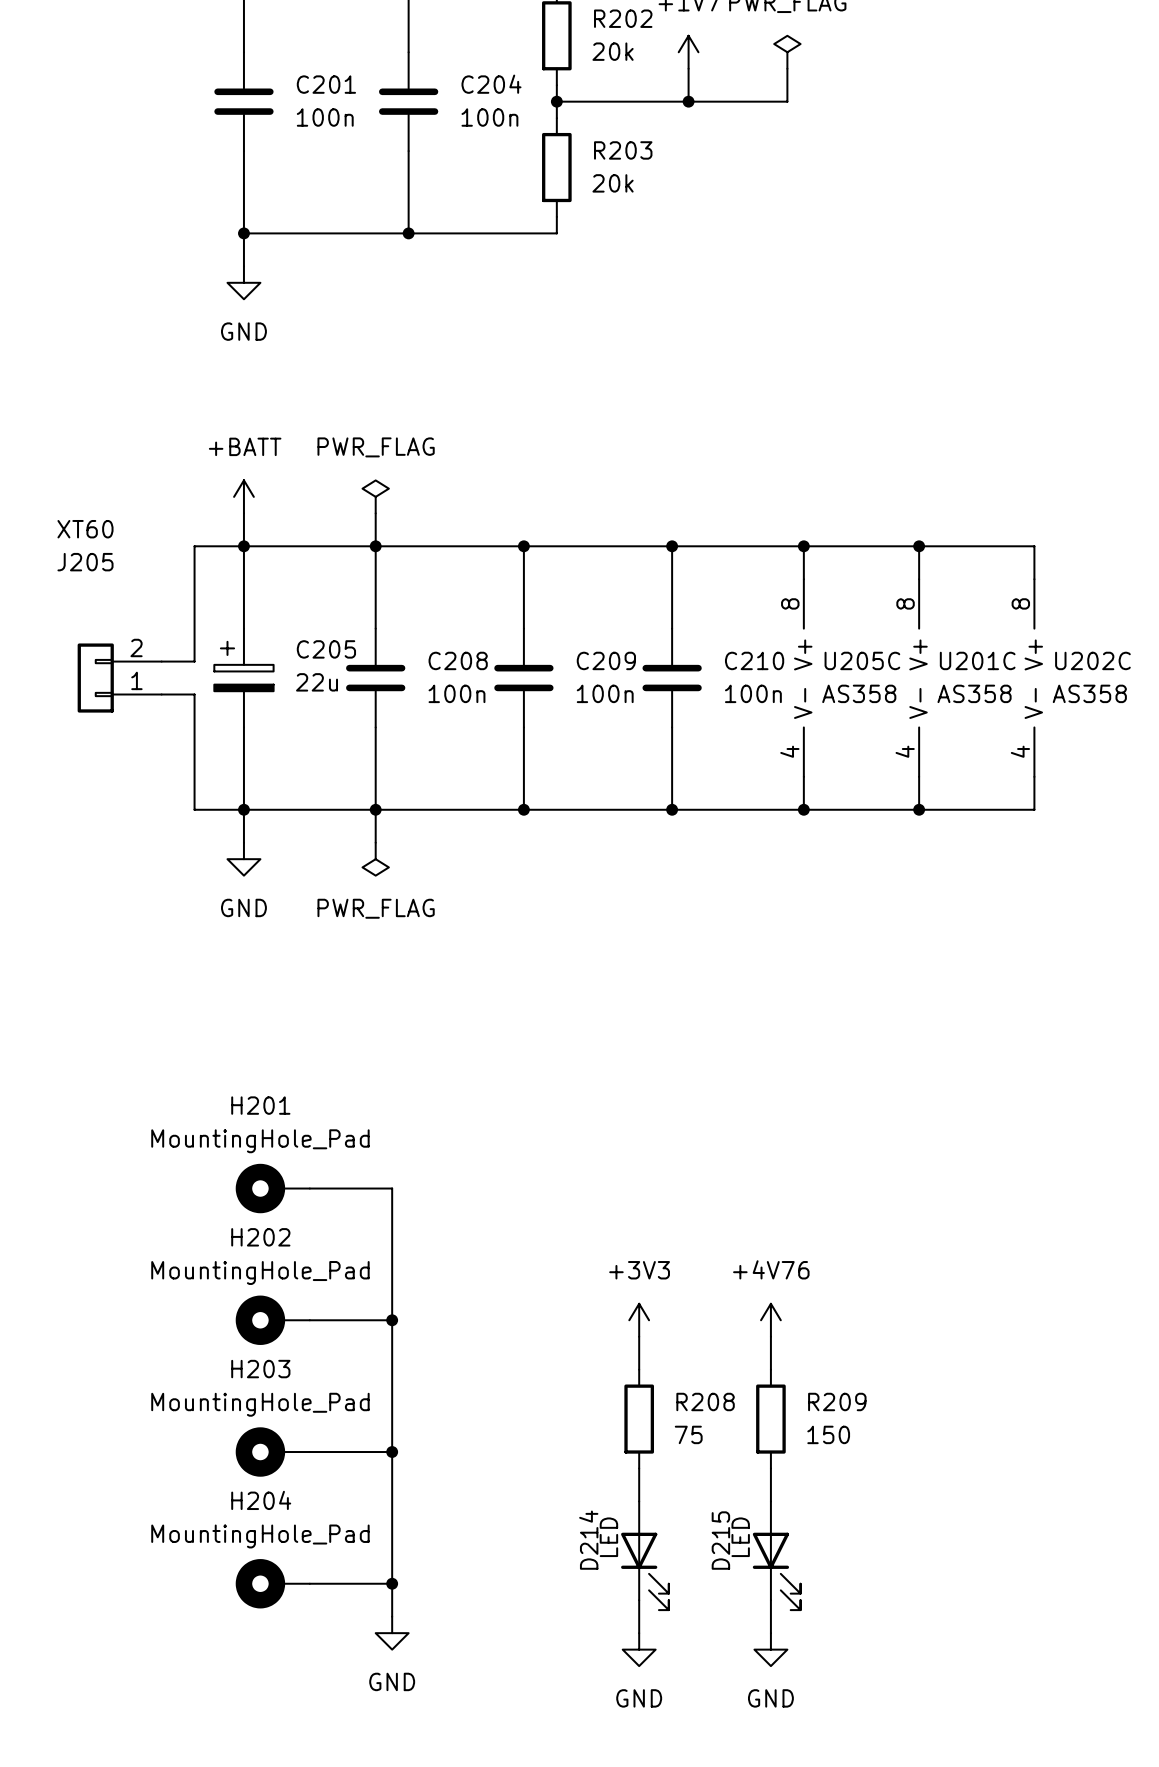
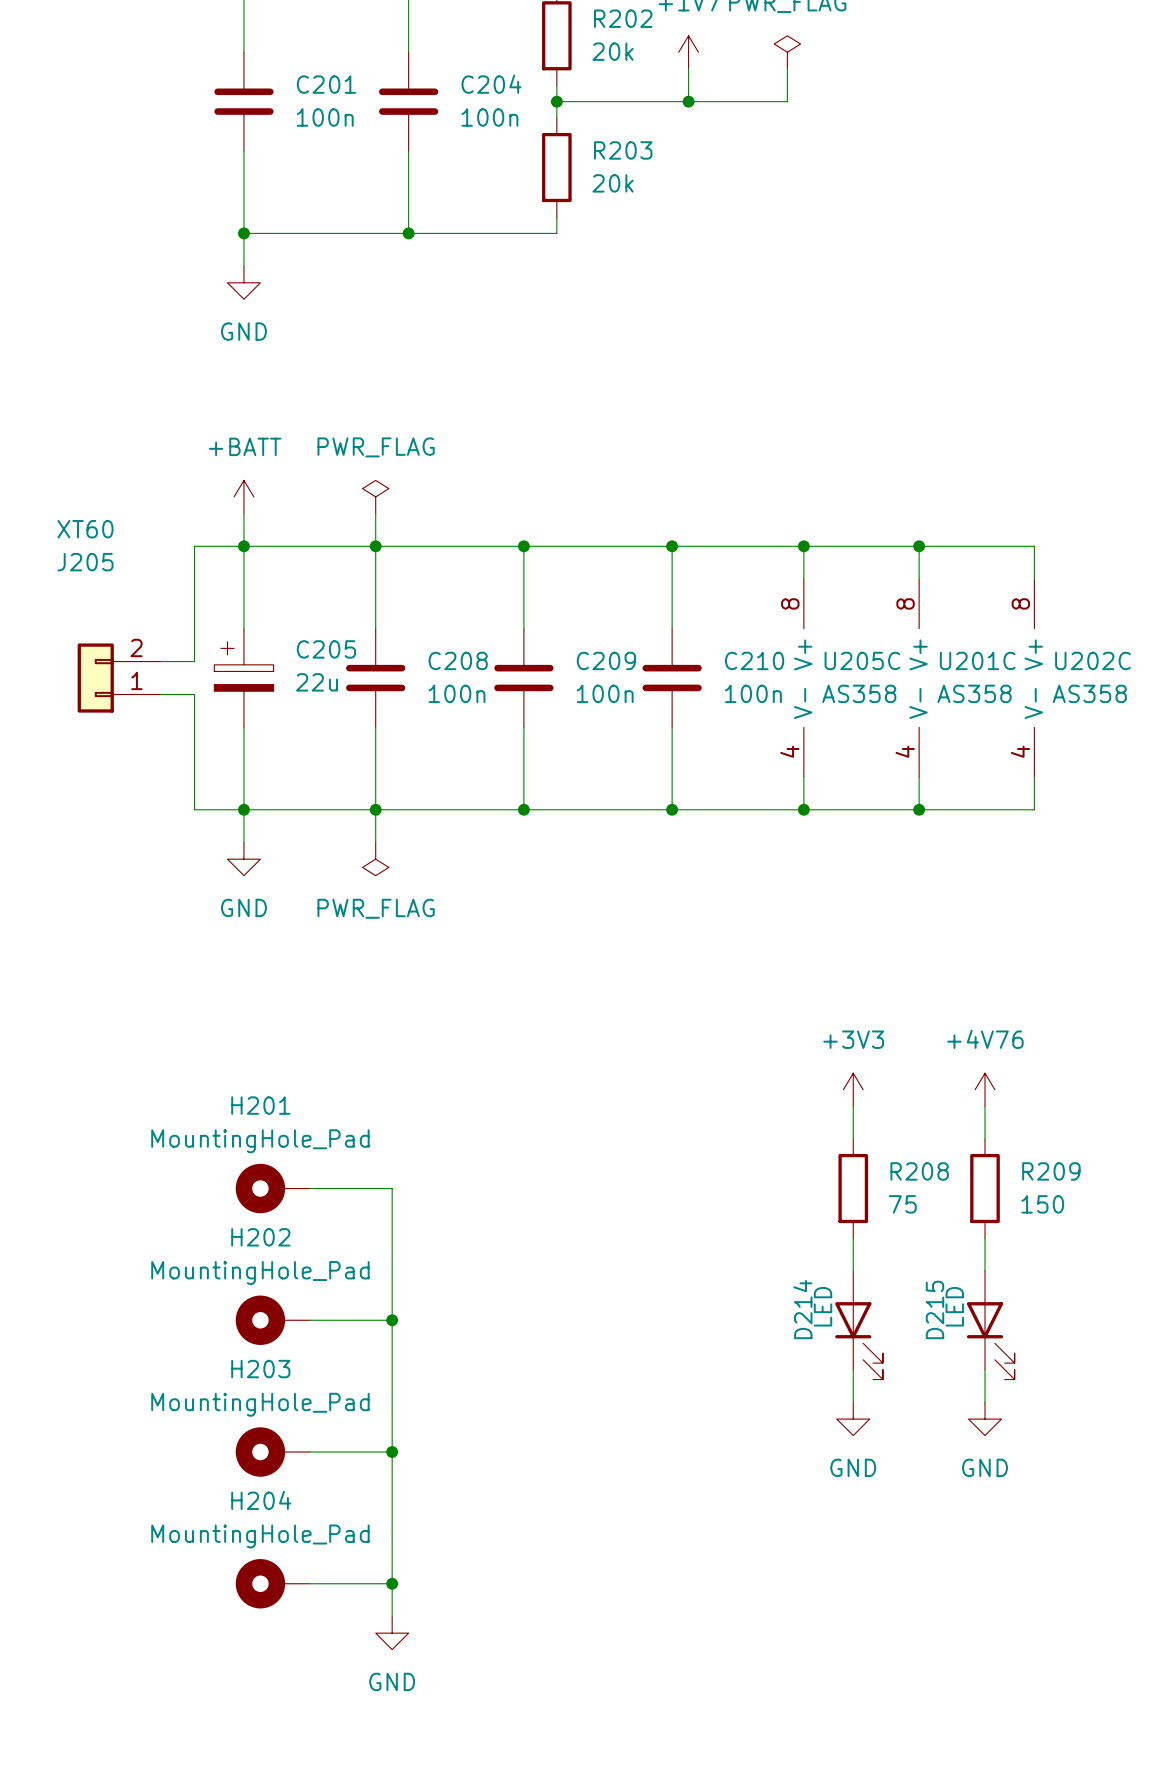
power symbol position: +3V3 (639, 1320) -> +3V3 (853, 1089)
power symbol position: +4V76 (770, 1320) -> +4V76 (985, 1089)
wire: (639, 1336) (639, 1369) -> (853, 1106) (853, 1139)
wire: (770, 1336) (770, 1369) -> (985, 1106) (985, 1139)
R208 position: (639, 1419) -> (853, 1188)
R209 position: (770, 1419) -> (985, 1188)
power symbol: none -> GND (853, 1419)
power symbol: none -> GND (985, 1419)
wire: (639, 1468) (639, 1501) -> (853, 1237) (853, 1270)
wire: (770, 1468) (770, 1501) -> (985, 1237) (985, 1270)
D214 position: (644, 1555) -> (859, 1325)
D215 position: (776, 1555) -> (990, 1325)
wire: (639, 1600) (639, 1633) -> (853, 1369) (853, 1402)
wire: (770, 1600) (770, 1633) -> (985, 1369) (985, 1402)
power symbol: GND (639, 1649) -> none
power symbol: GND (770, 1649) -> none

